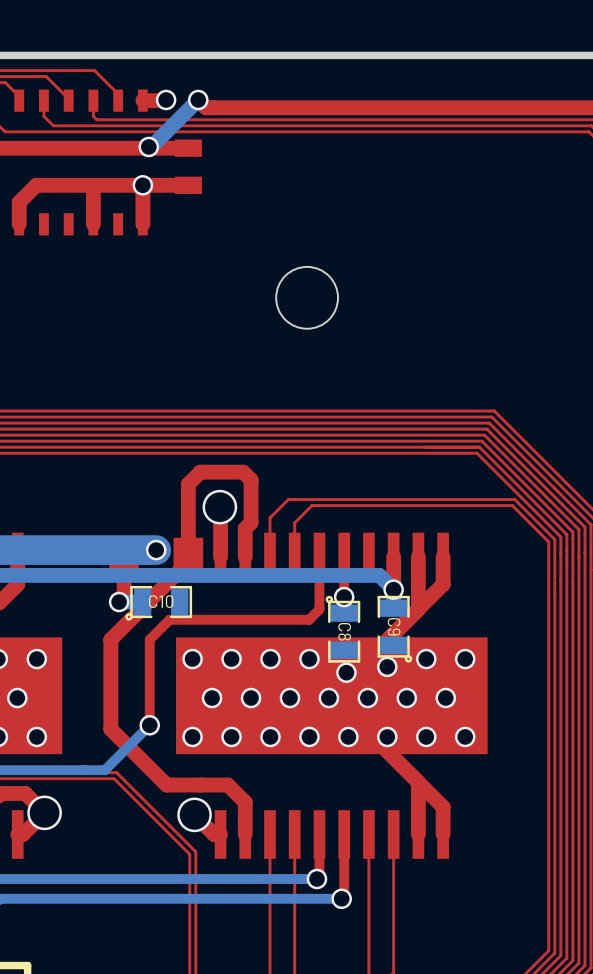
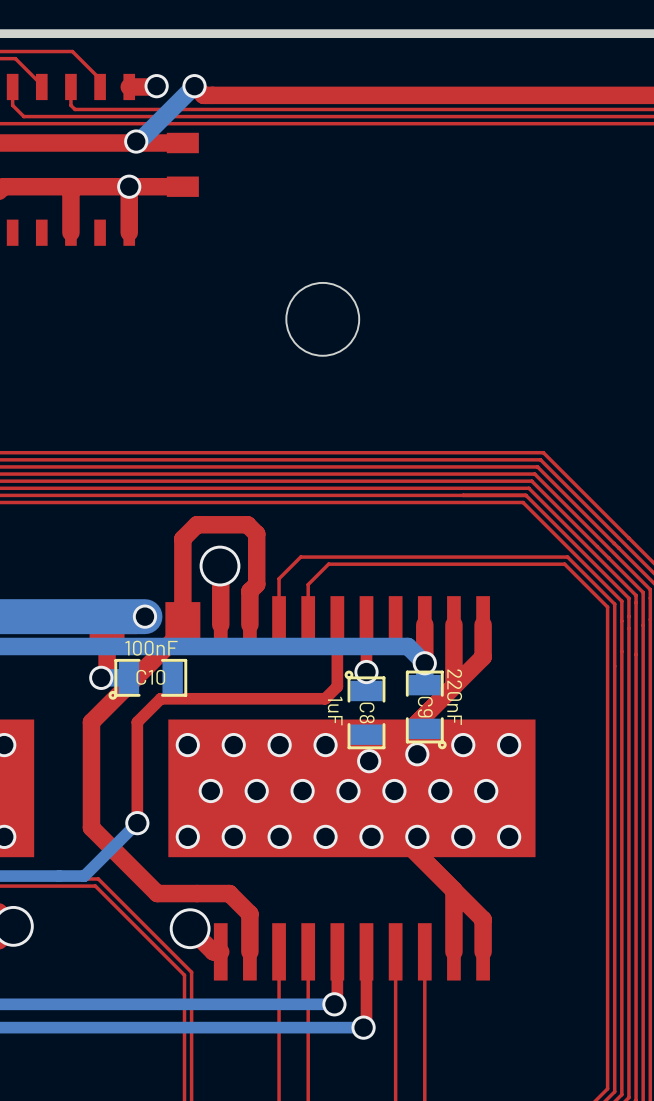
C10 value: none -> 100nF (151, 648)
C9 value: none -> 220nF (454, 697)
C8 value: none -> 1uF (335, 711)

